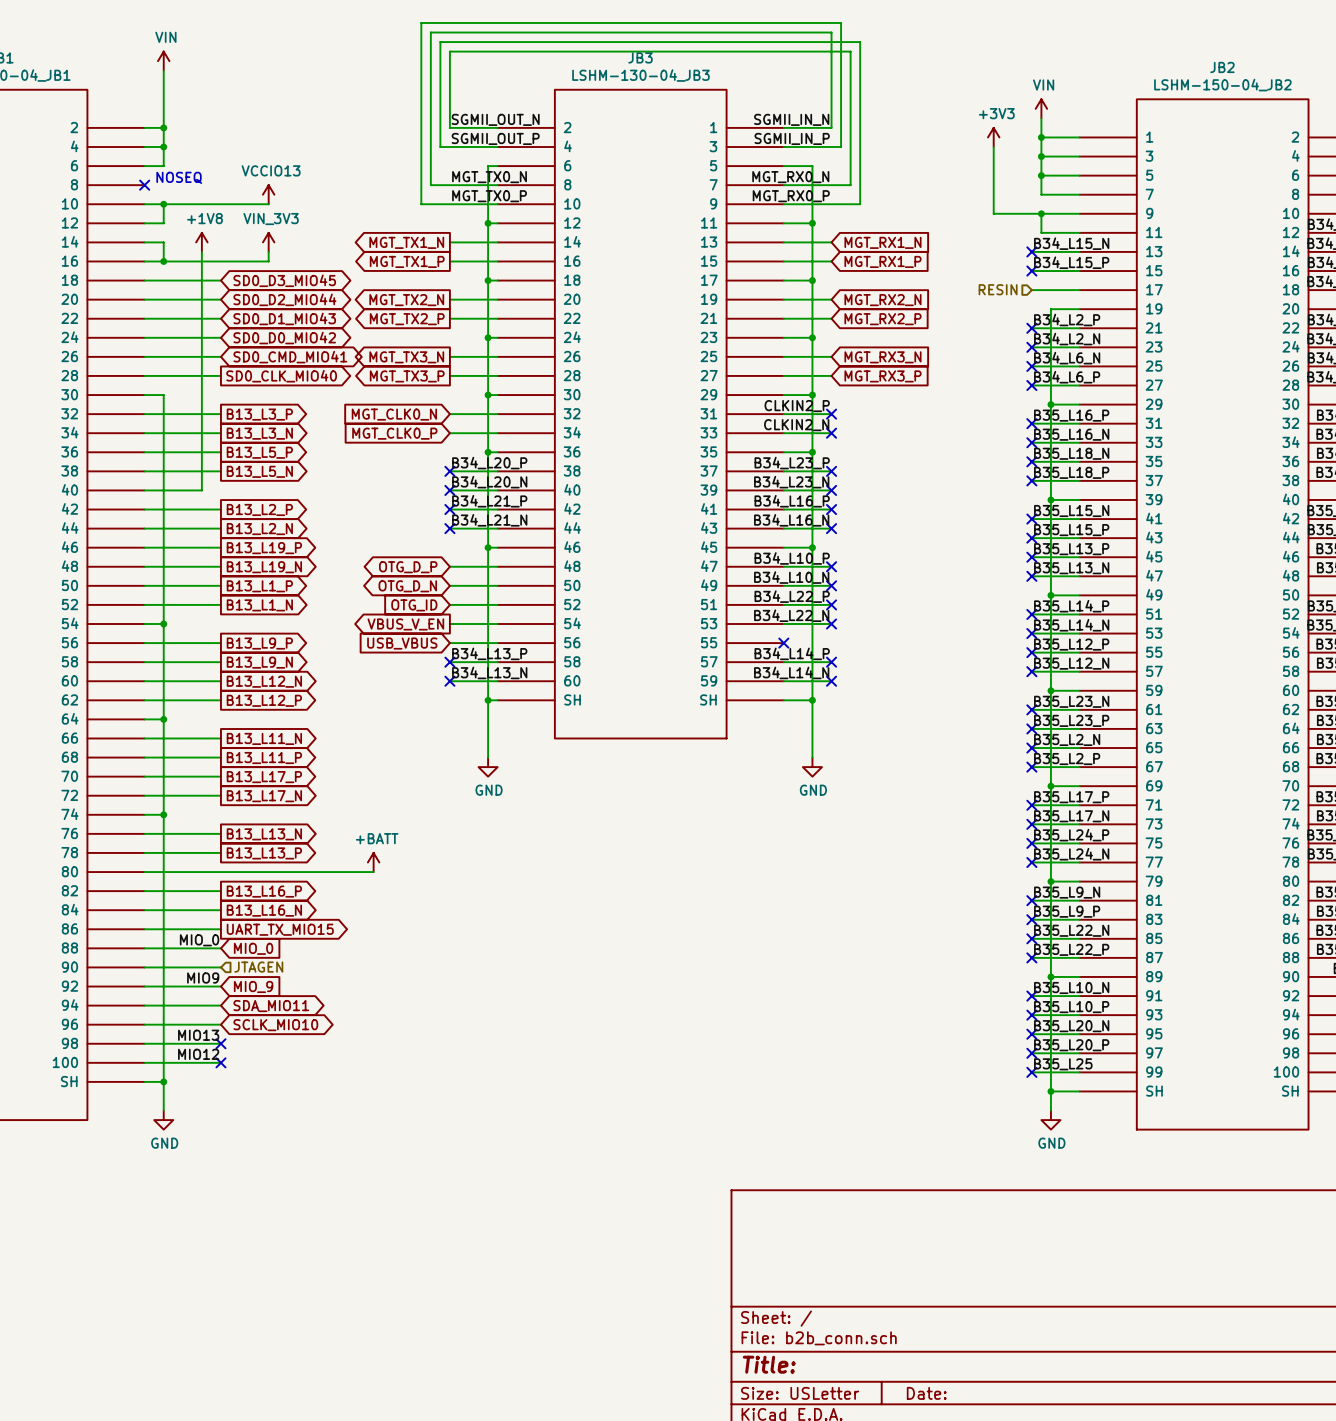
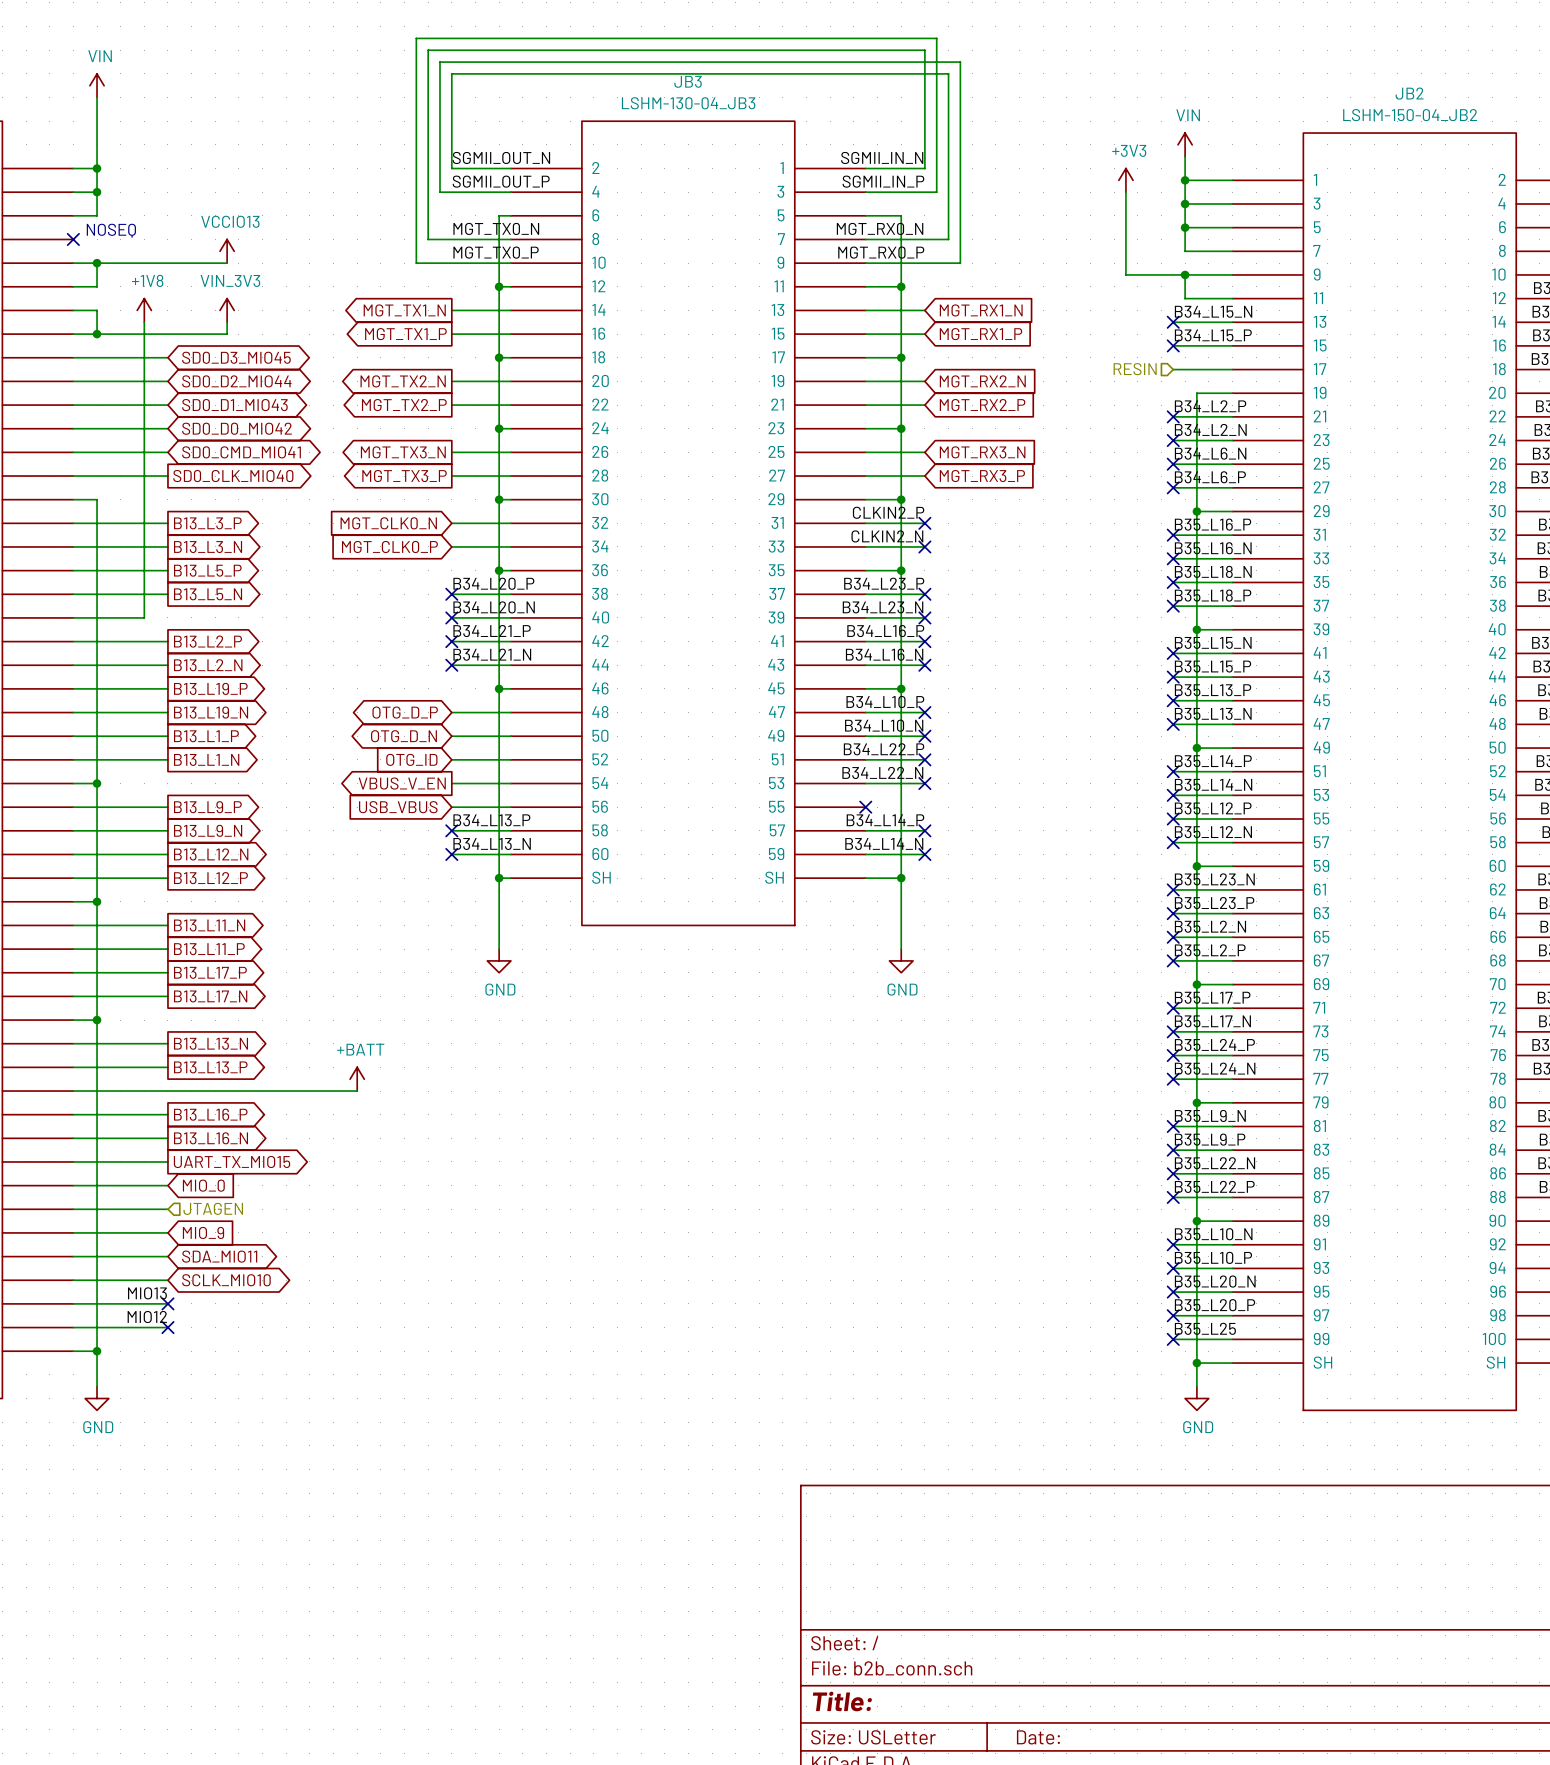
label: MIO_0 (199, 940) -> none
label: MIO9 (203, 978) -> none

